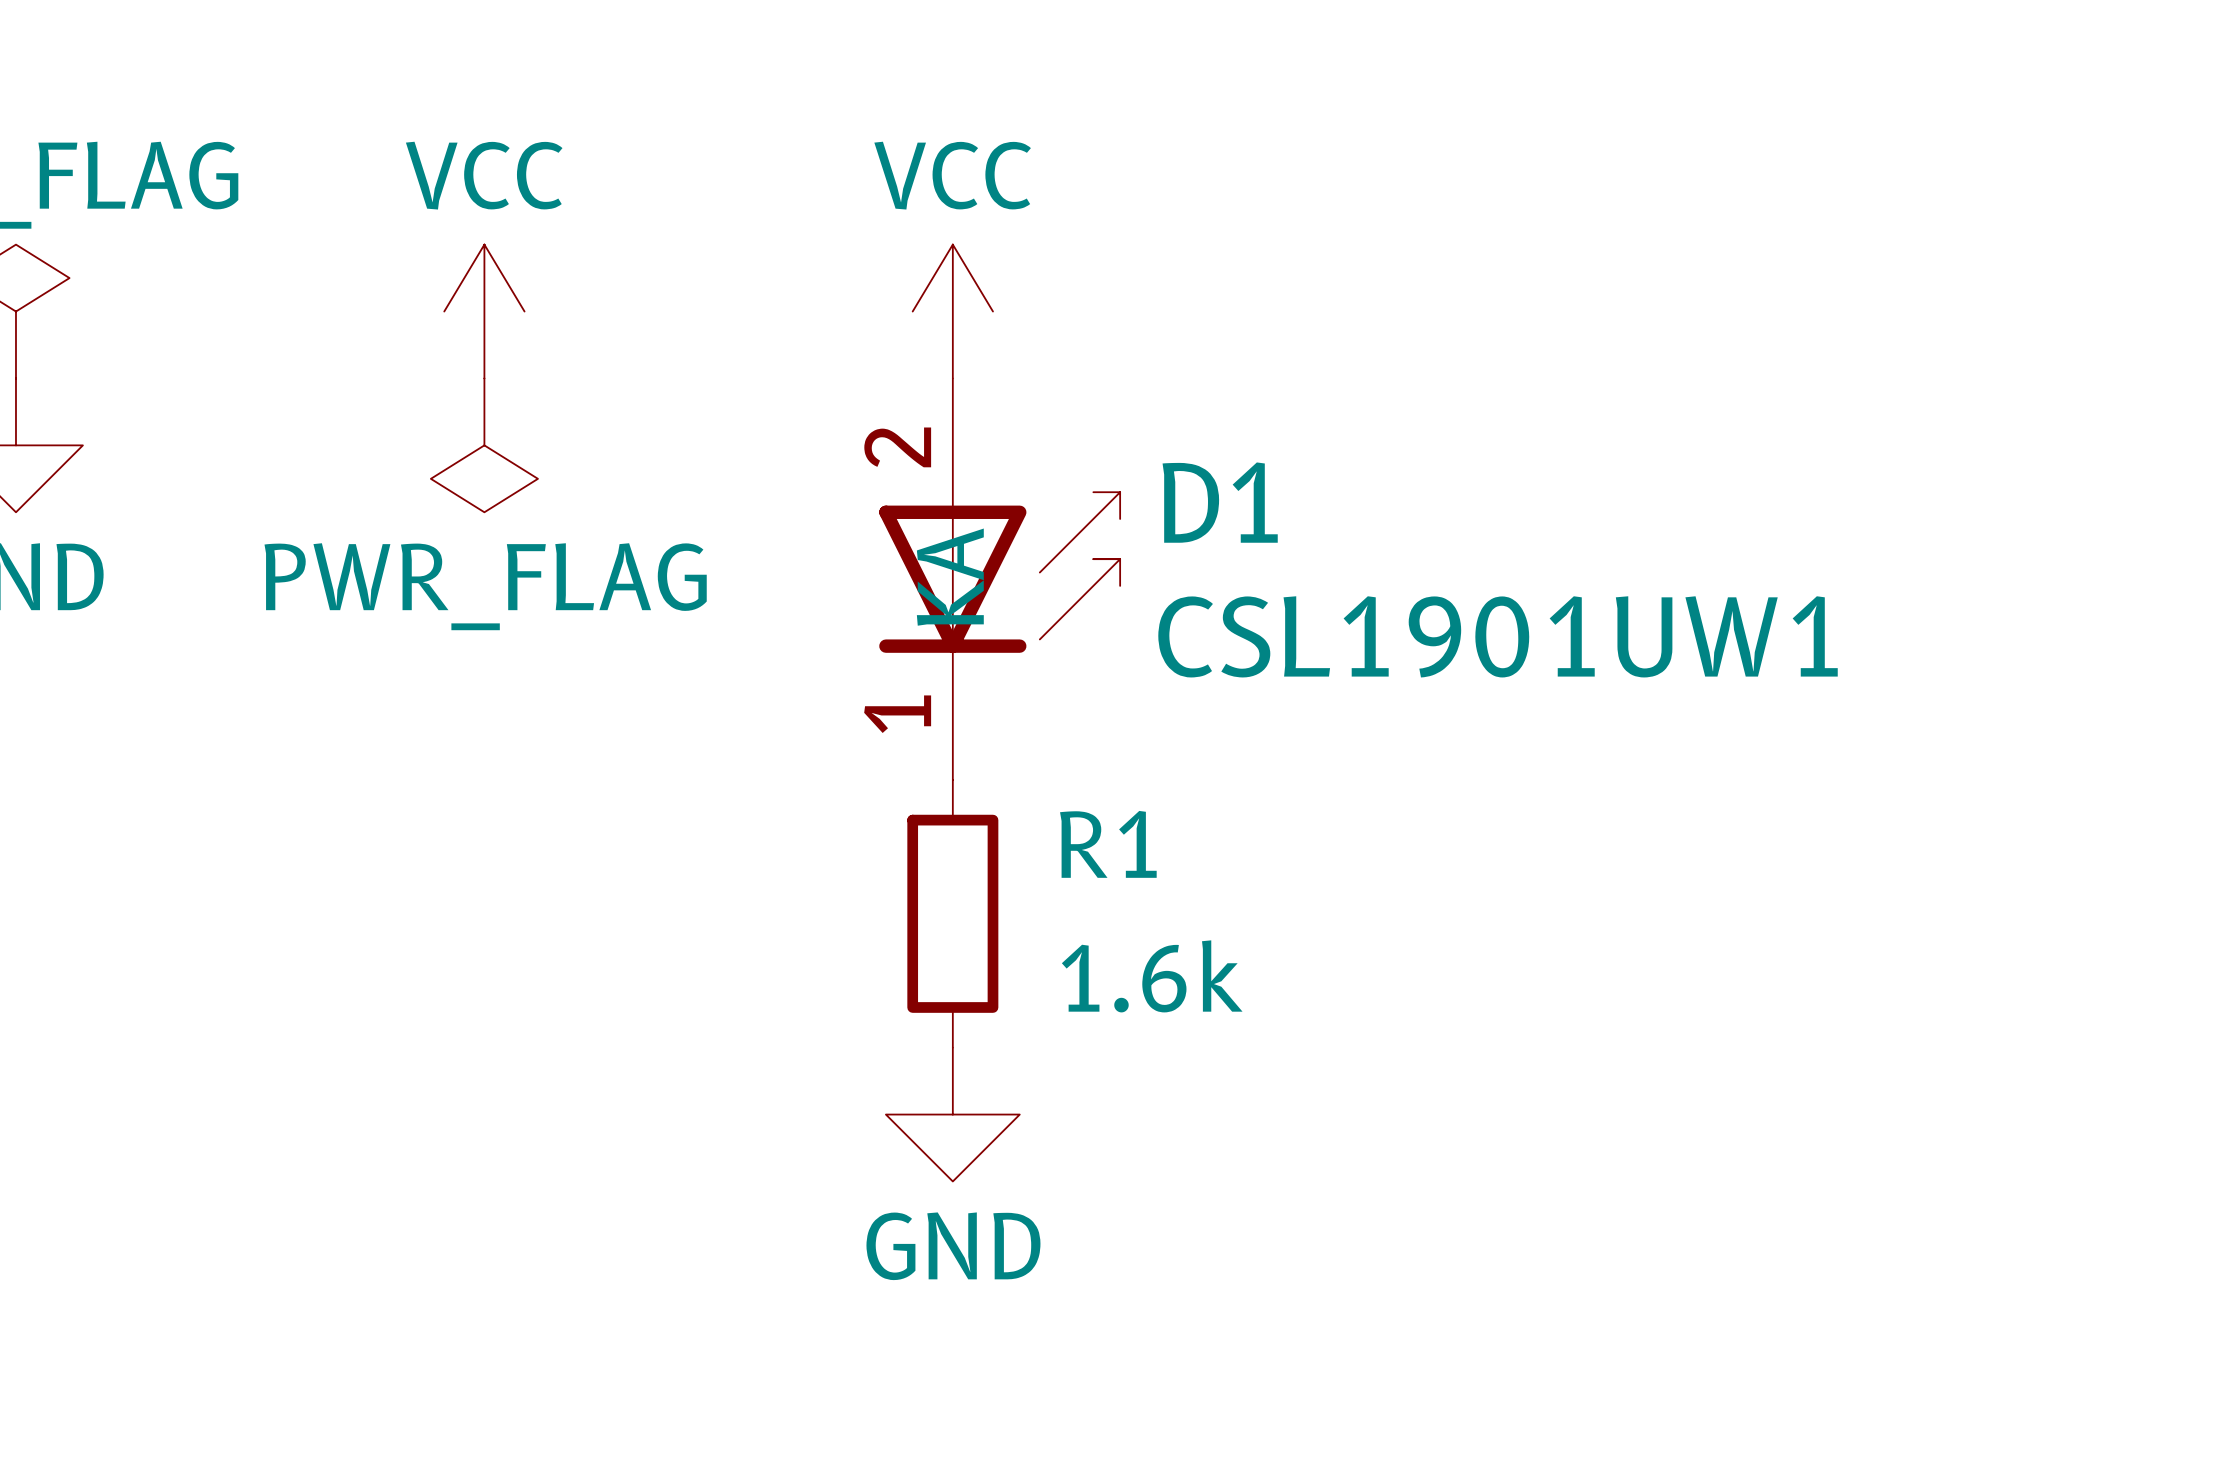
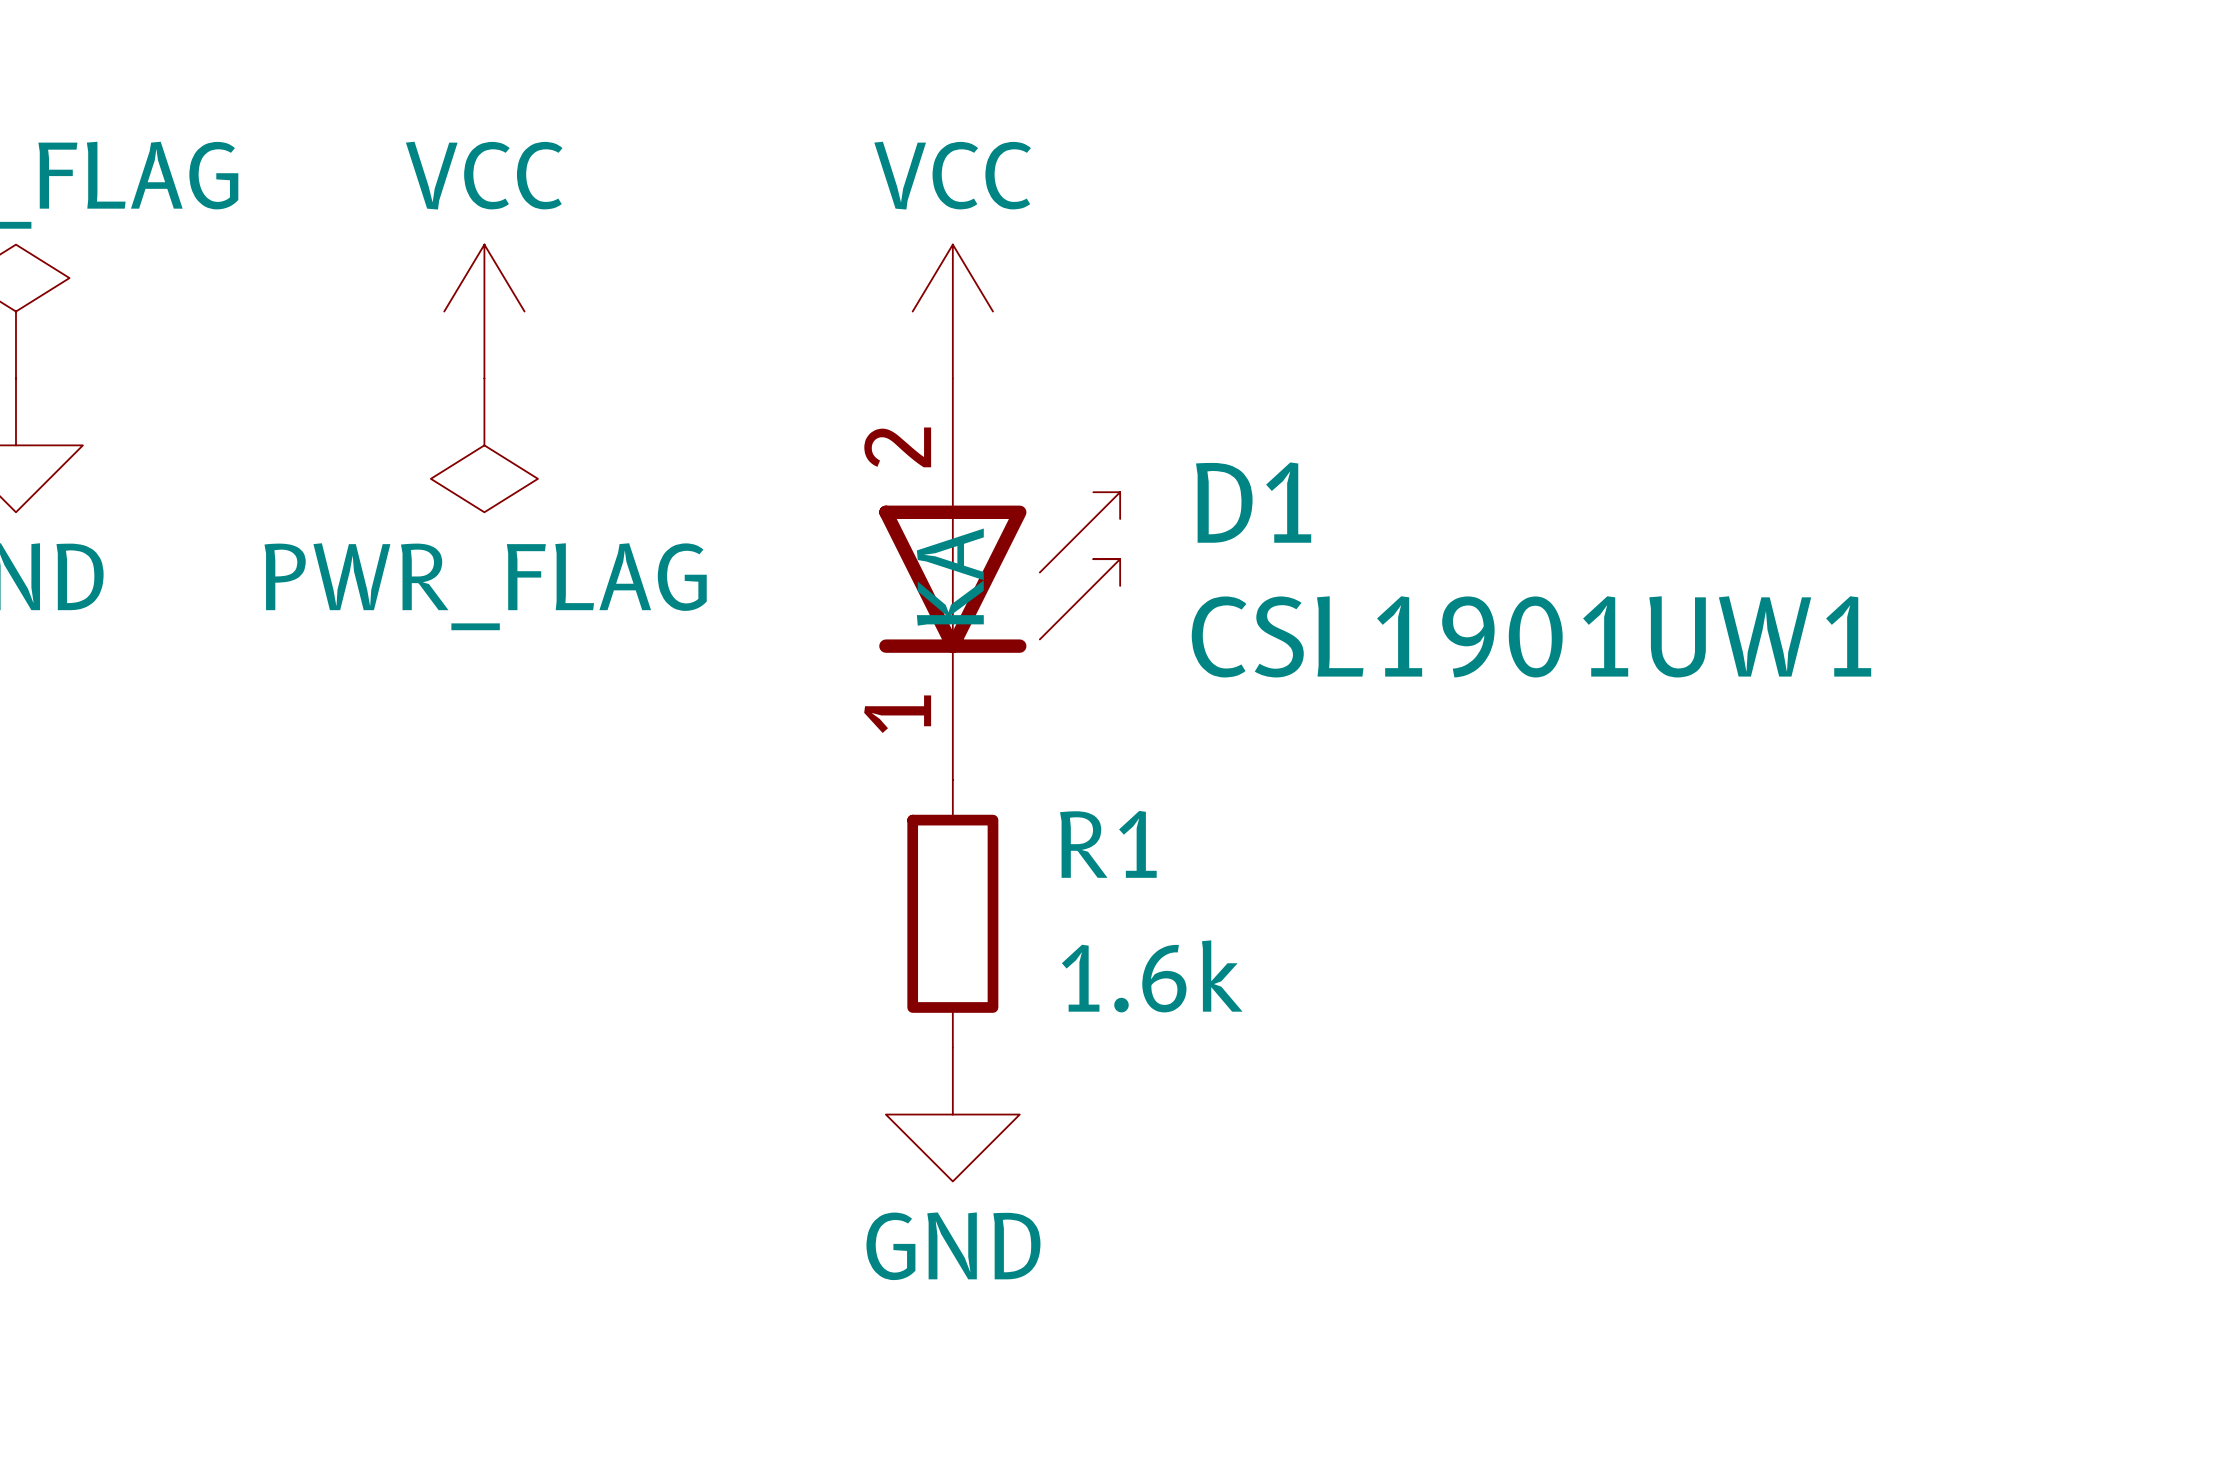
D1 name position: D1 (1220, 502) -> D1 (1253, 502)
D1 value position: CSL1901UW1 (1498, 636) -> CSL1901UW1 (1531, 636)

